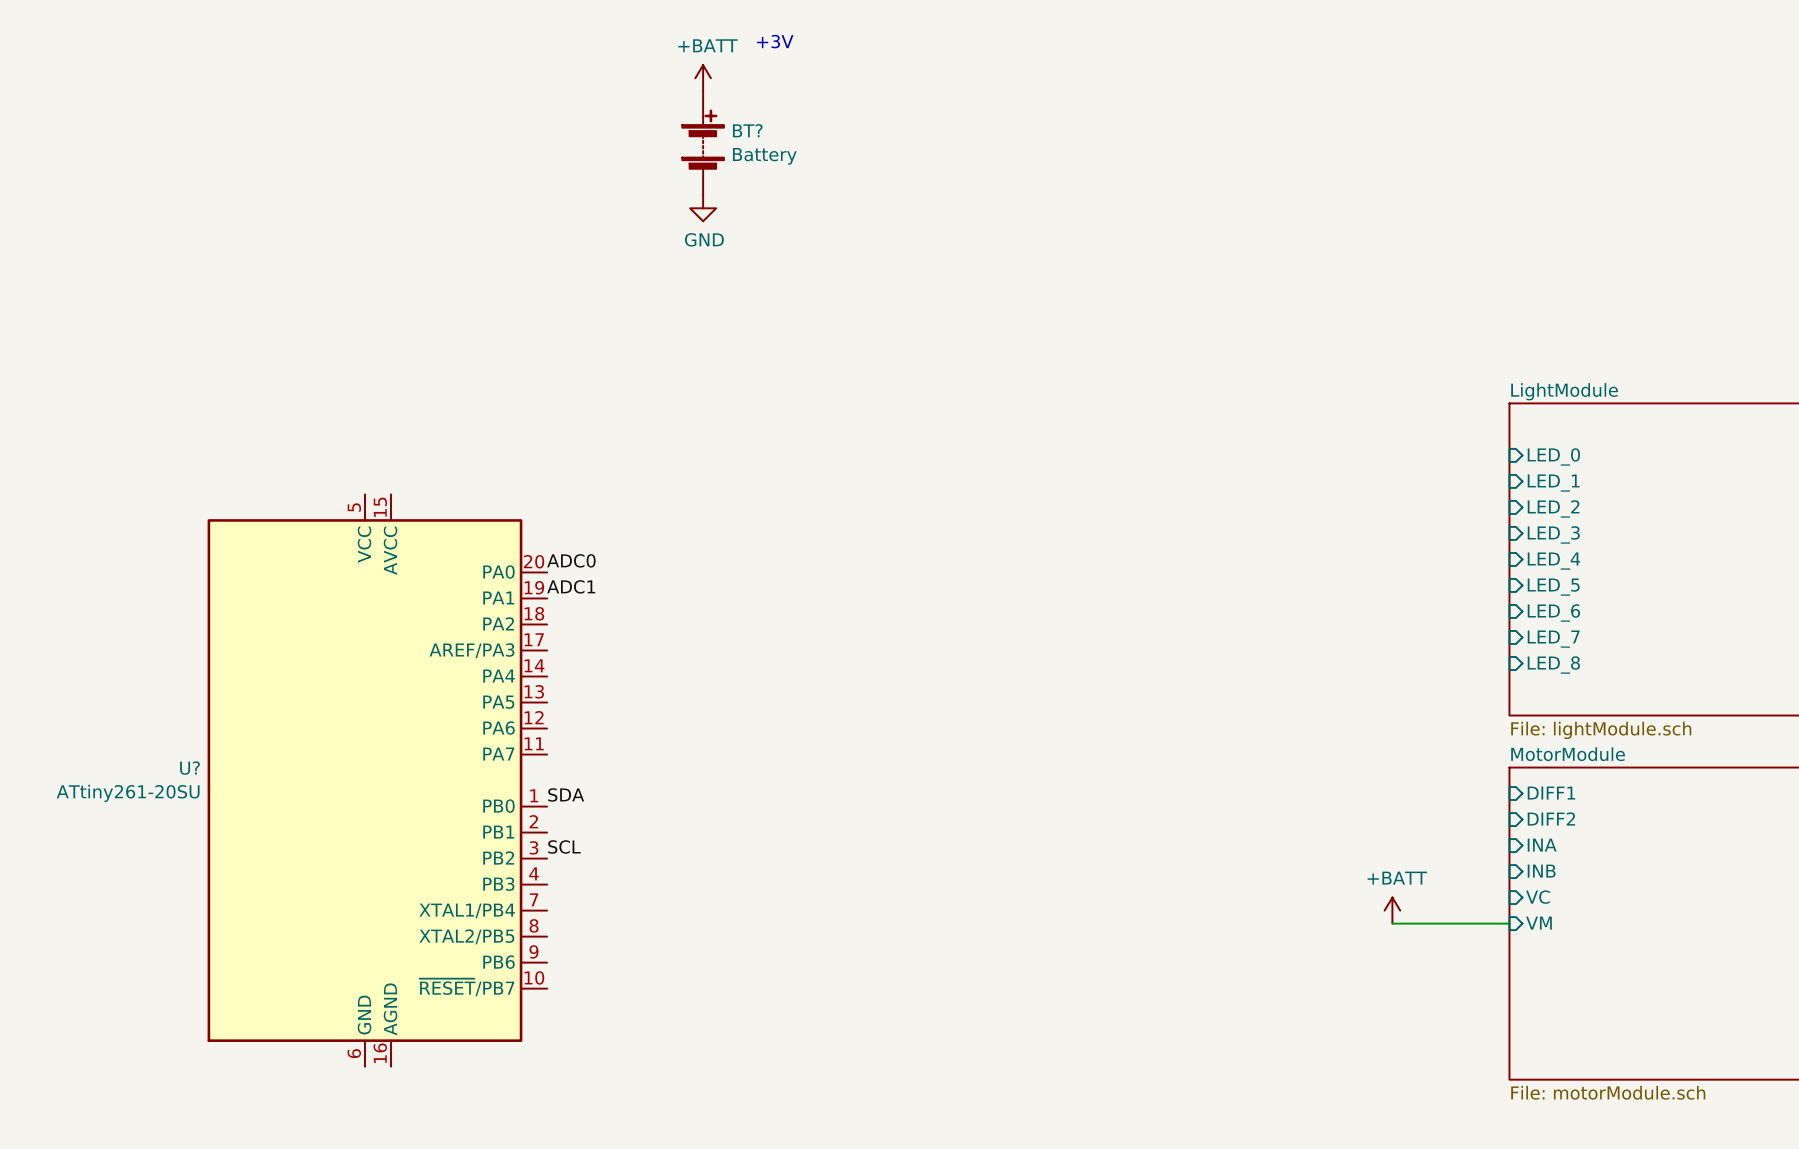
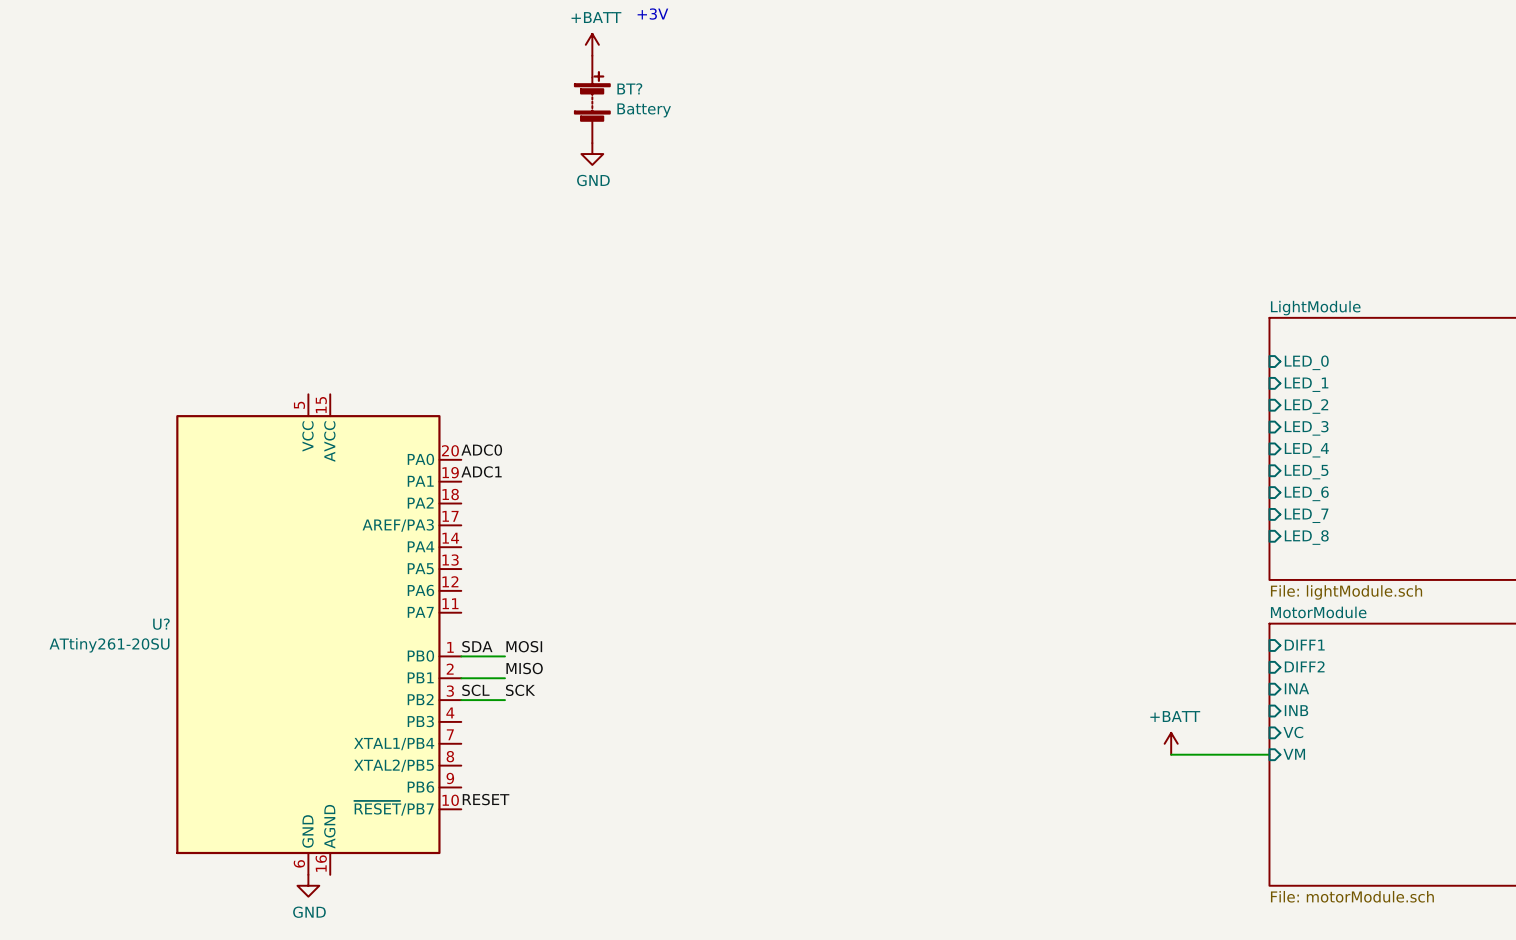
label: none -> MOSI (524, 646)
wire: none -> (461, 656) (504, 656)
label: none -> MISO (524, 668)
wire: none -> (461, 678) (504, 678)
label: none -> SCK (520, 690)
wire: none -> (461, 700) (504, 700)
label: none -> RESET (486, 799)
power symbol: none -> GND (308, 885)

